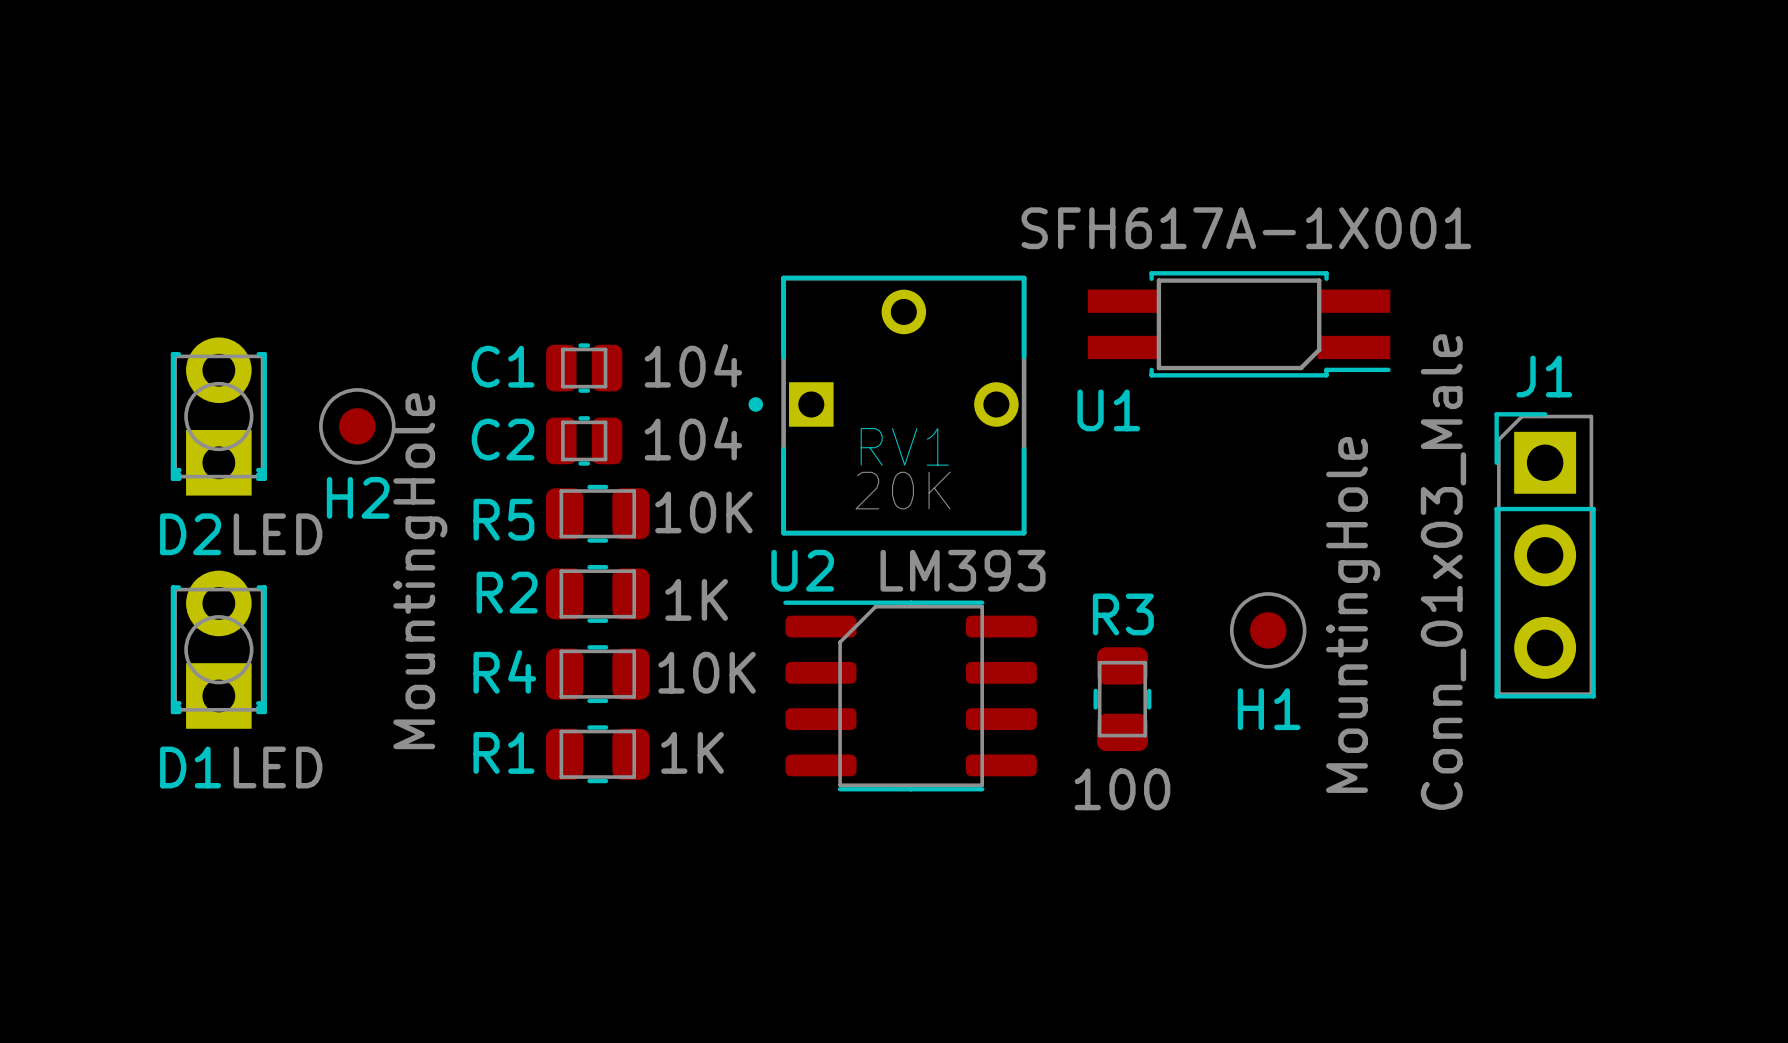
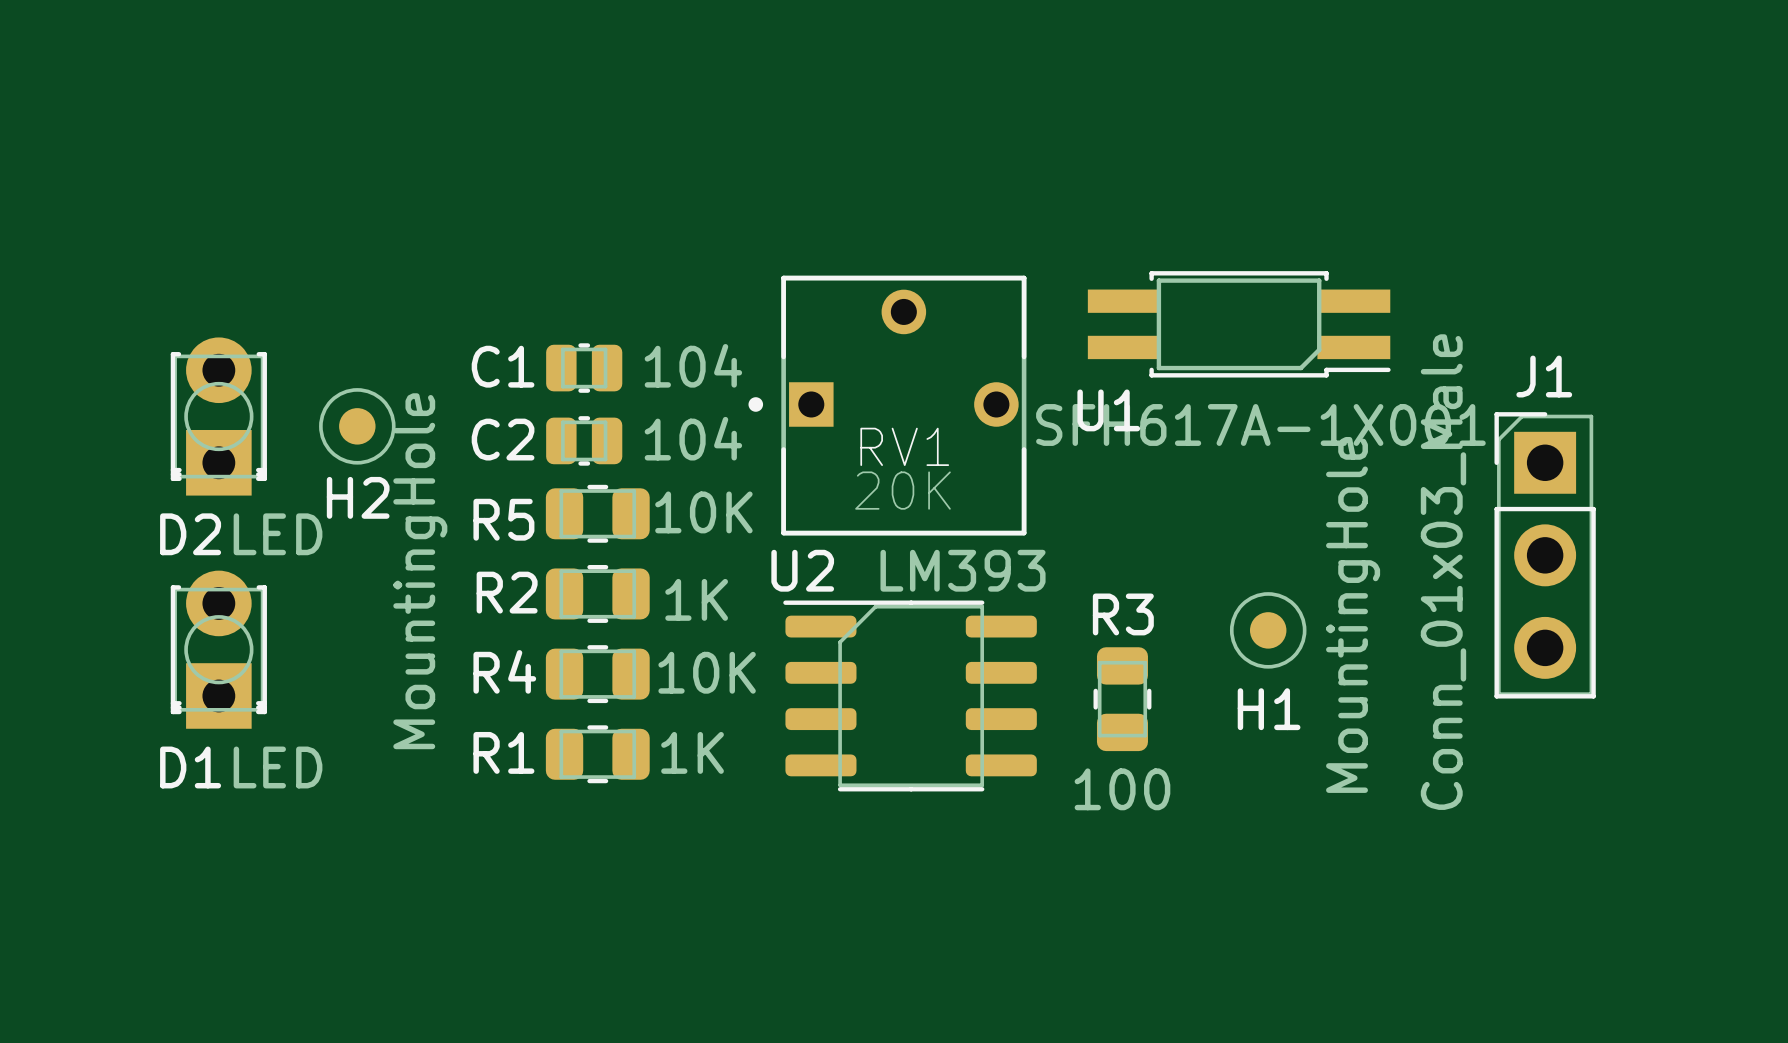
U1 value position: SFH617A-1X001 (1246, 228) -> SFH617A-1X001 (1260, 424)

